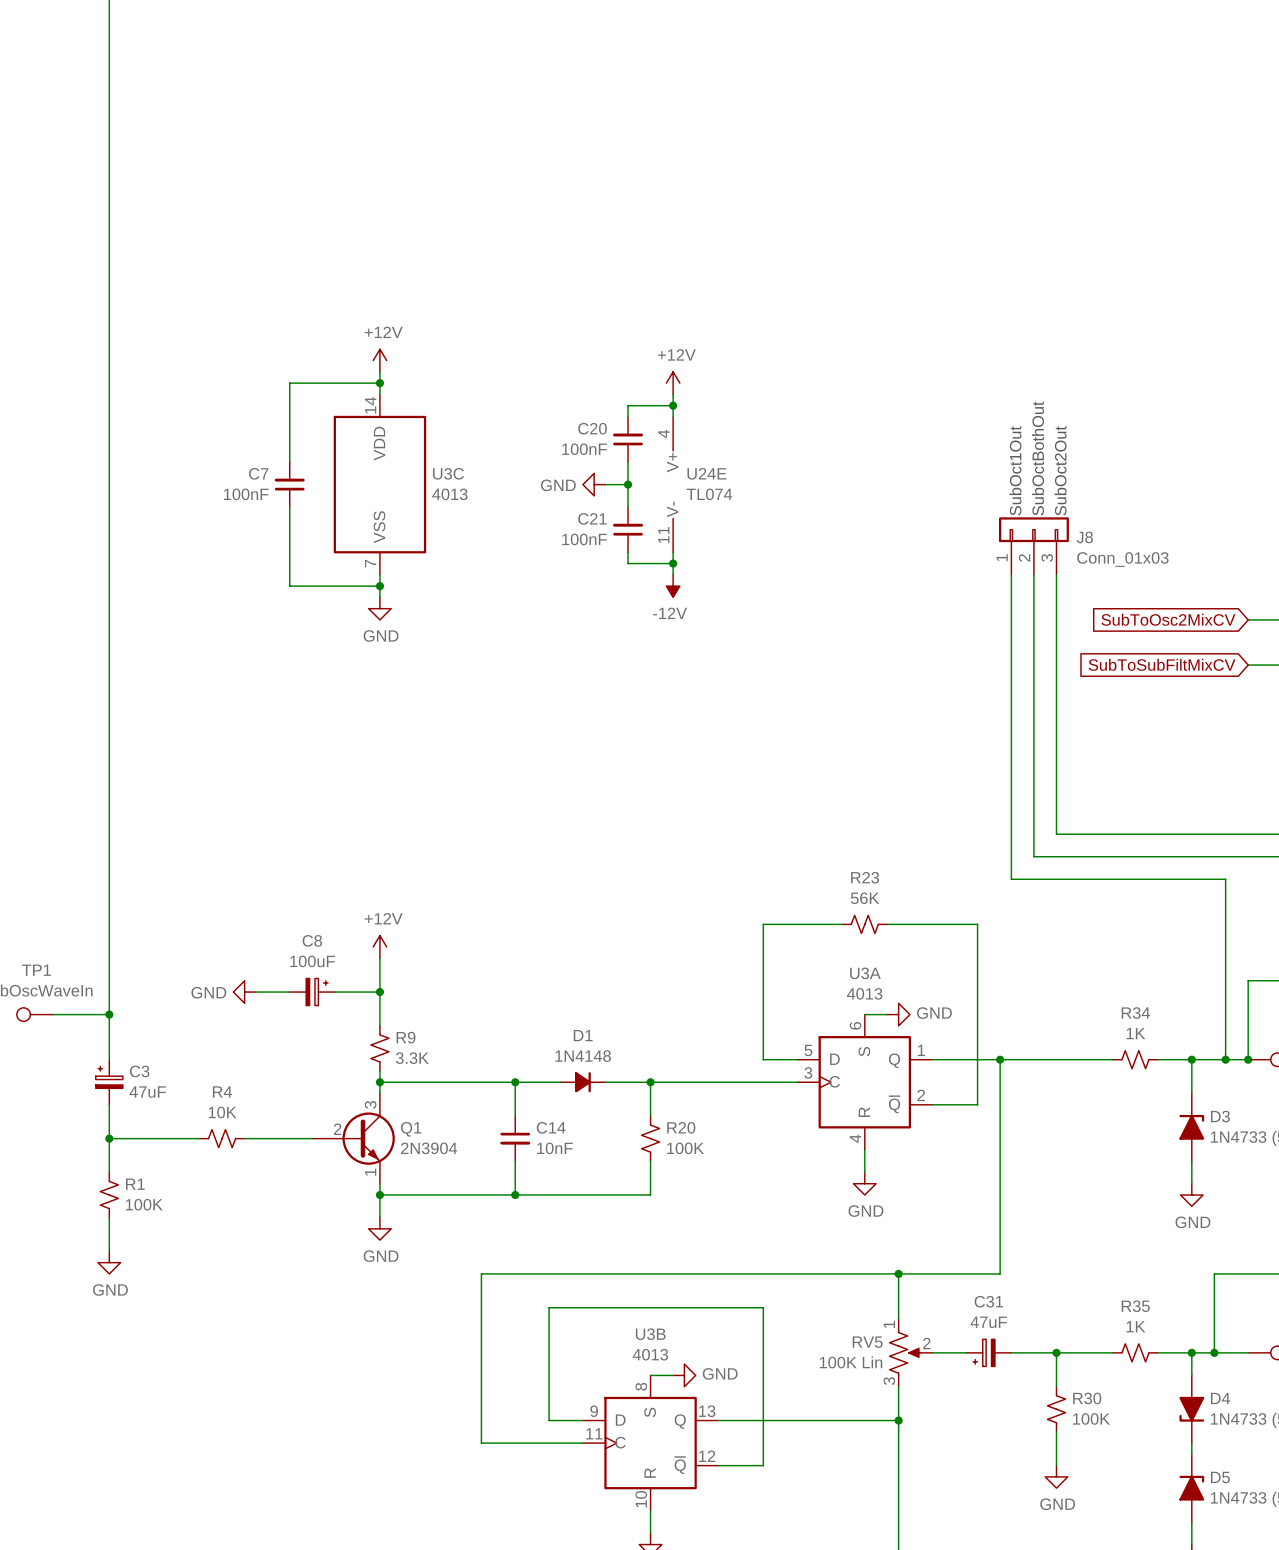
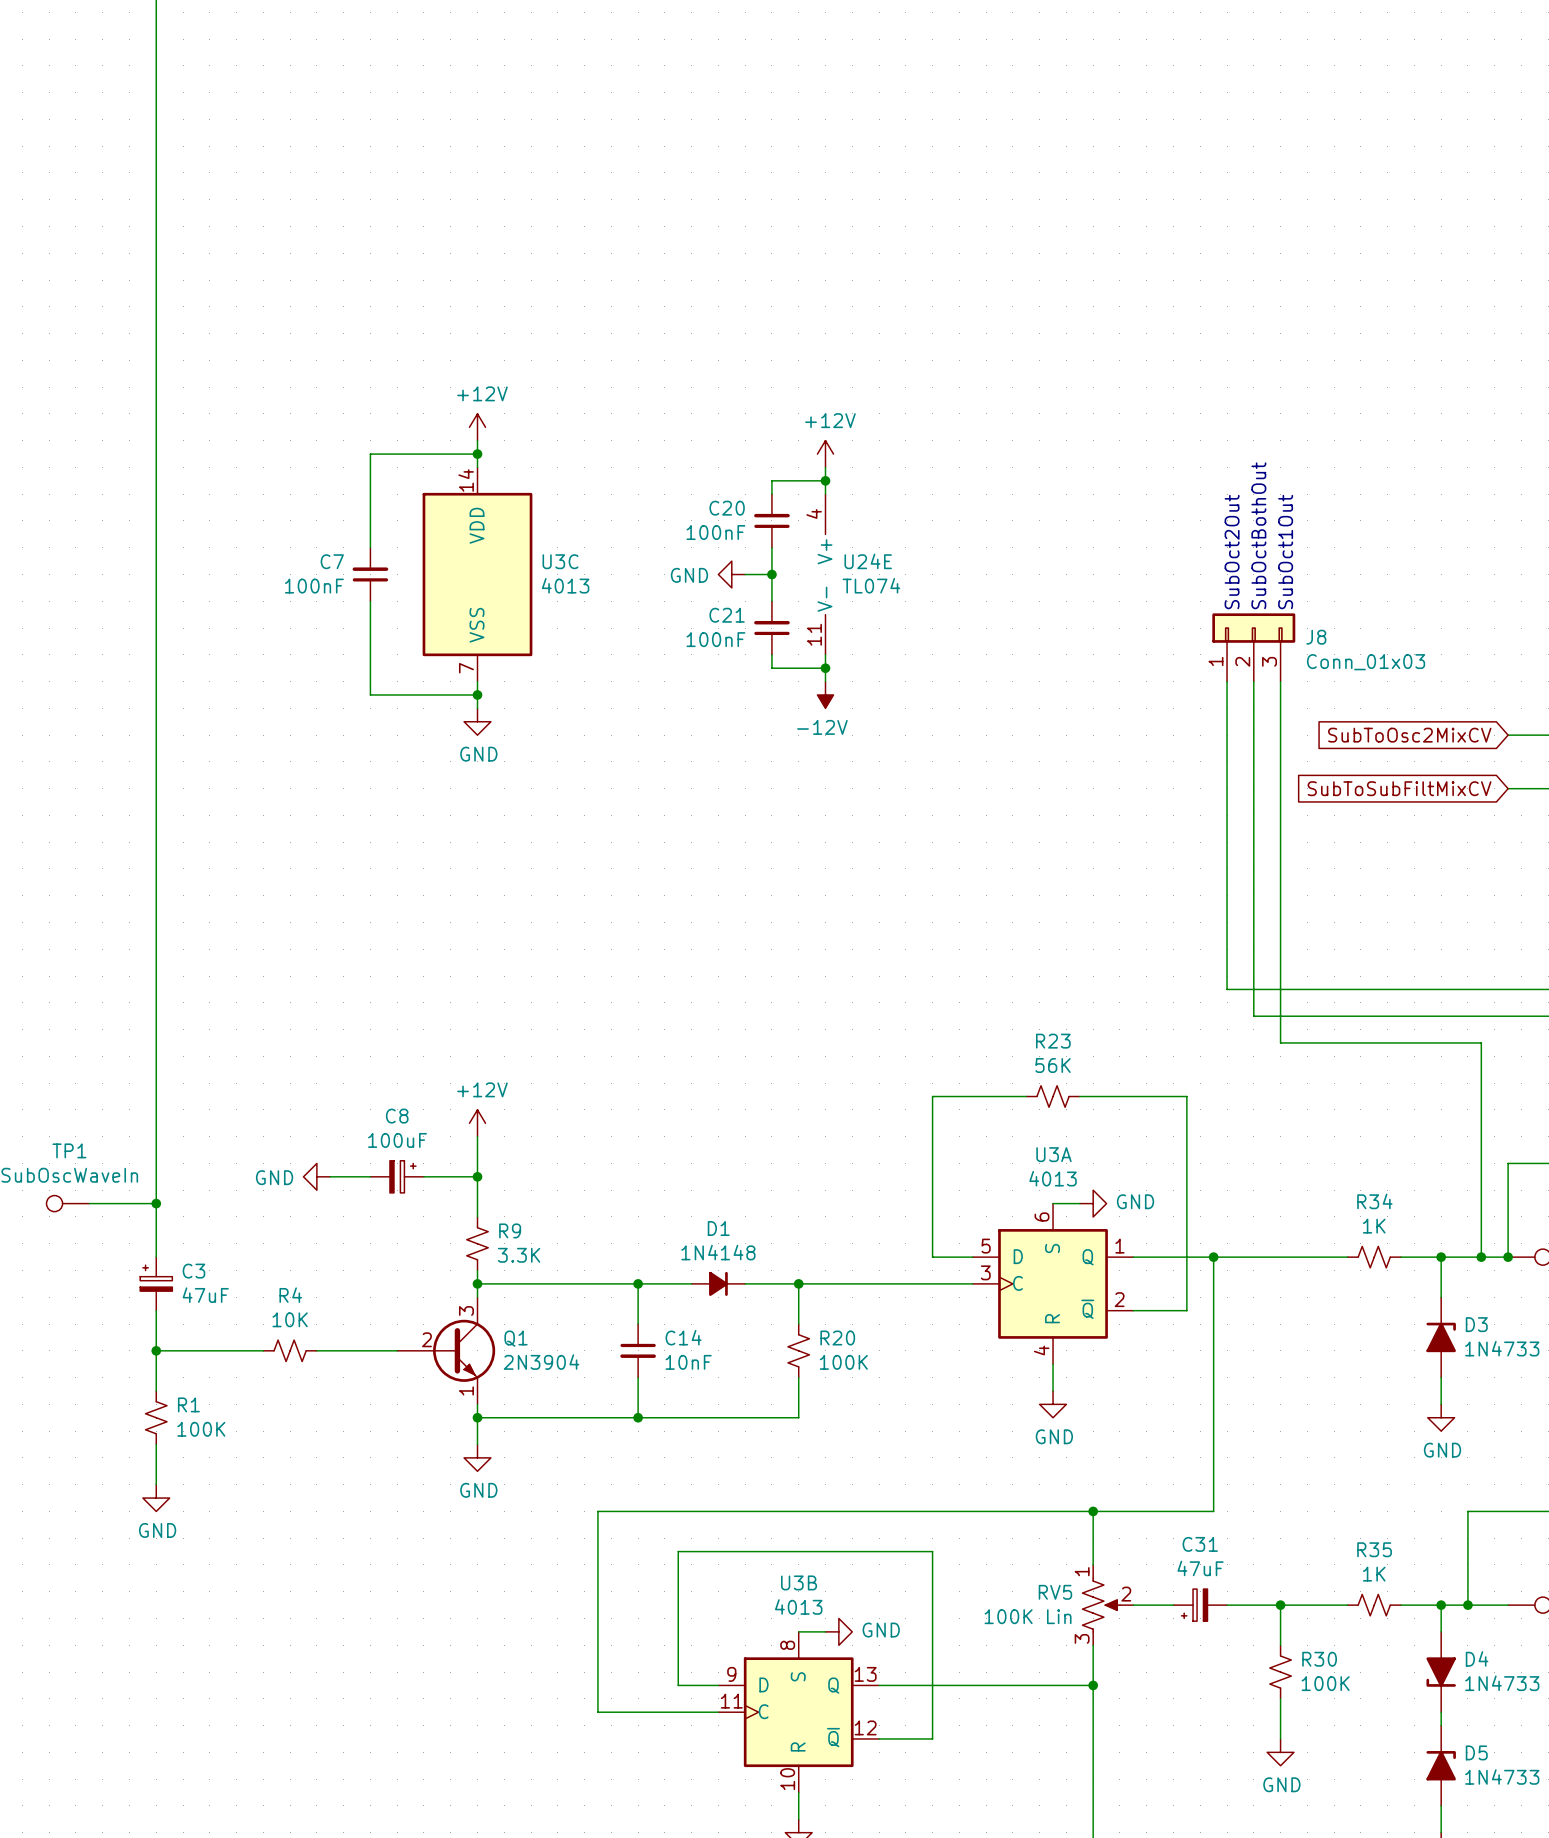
text: SubOct1Out (1015, 470) -> SubOct2Out (1232, 552)
text: SubOct2Out (1060, 470) -> SubOct1Out (1285, 552)
wire: (1011, 834) (1011, 879) (1056, 879) -> (1227, 989) (1280, 989) (1280, 1042)

